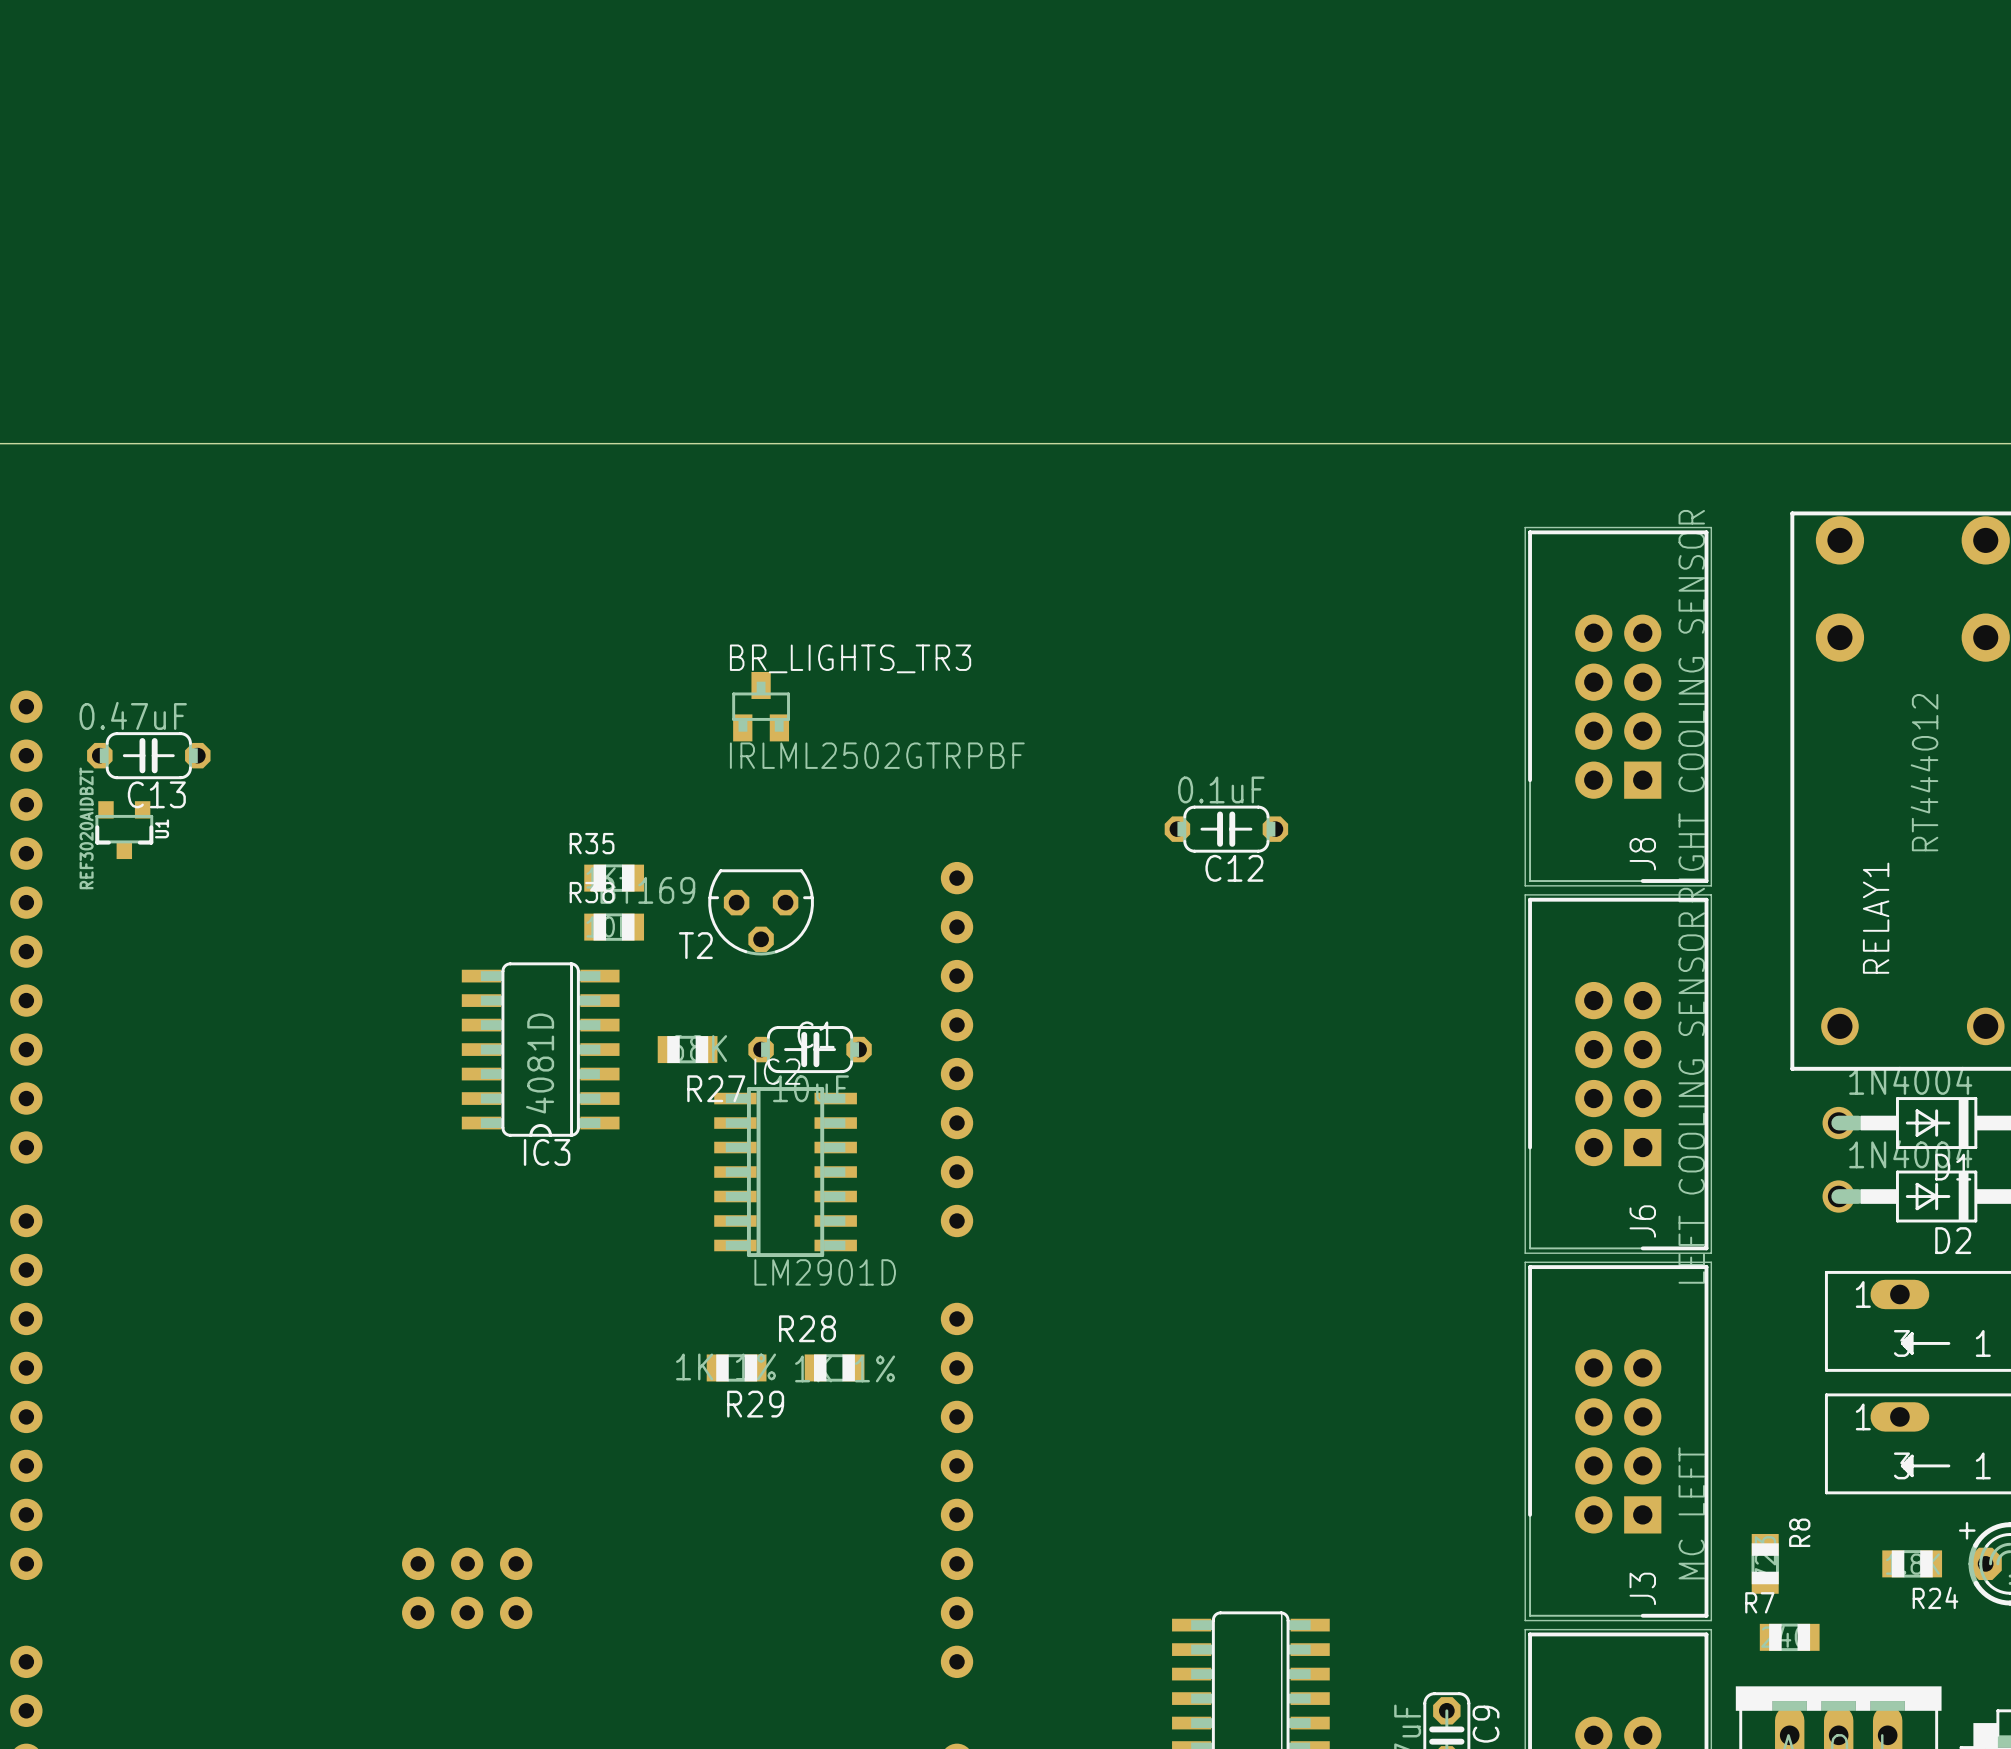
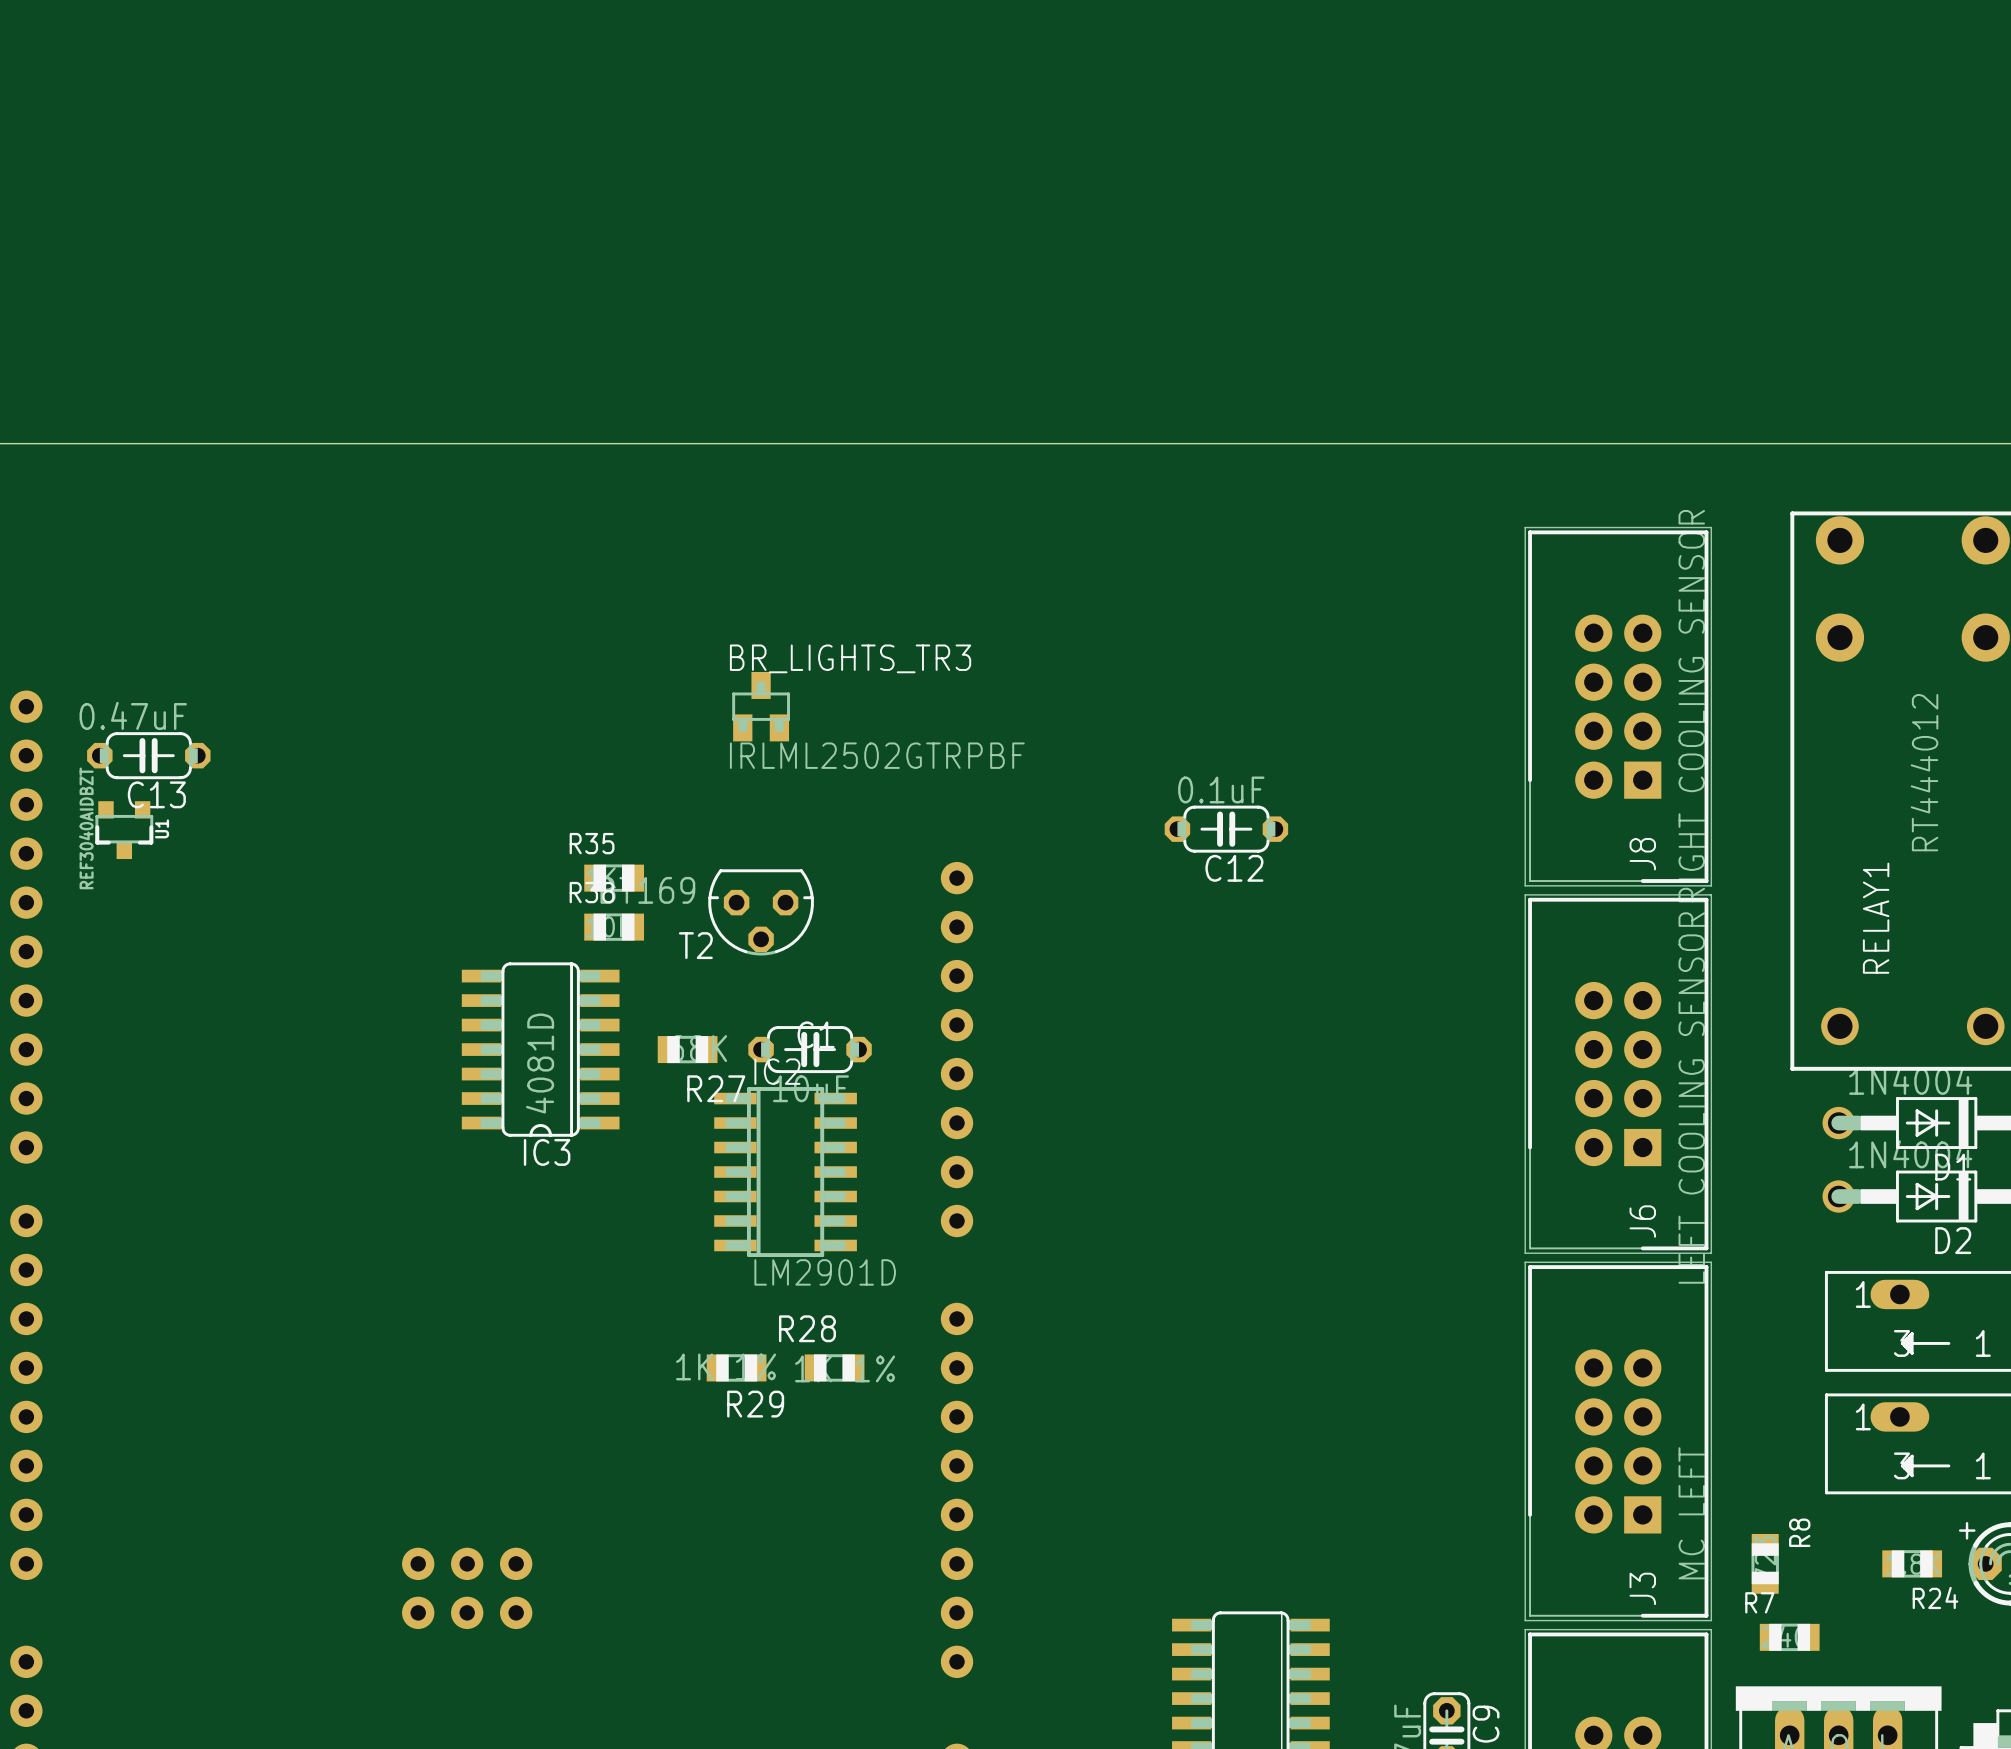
U1 value: REF3020AIDBZT (86, 828) -> REF3040AIDBZT (86, 828)

